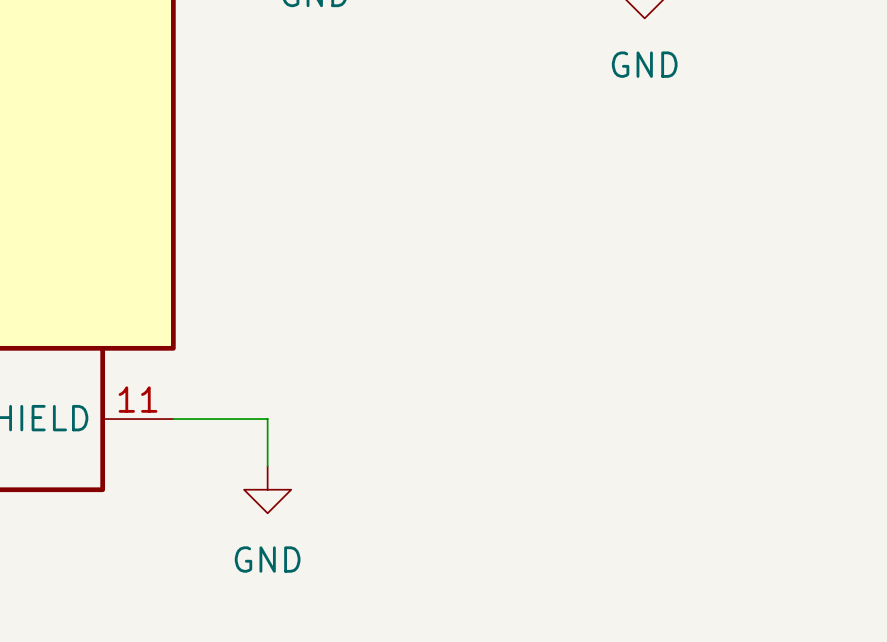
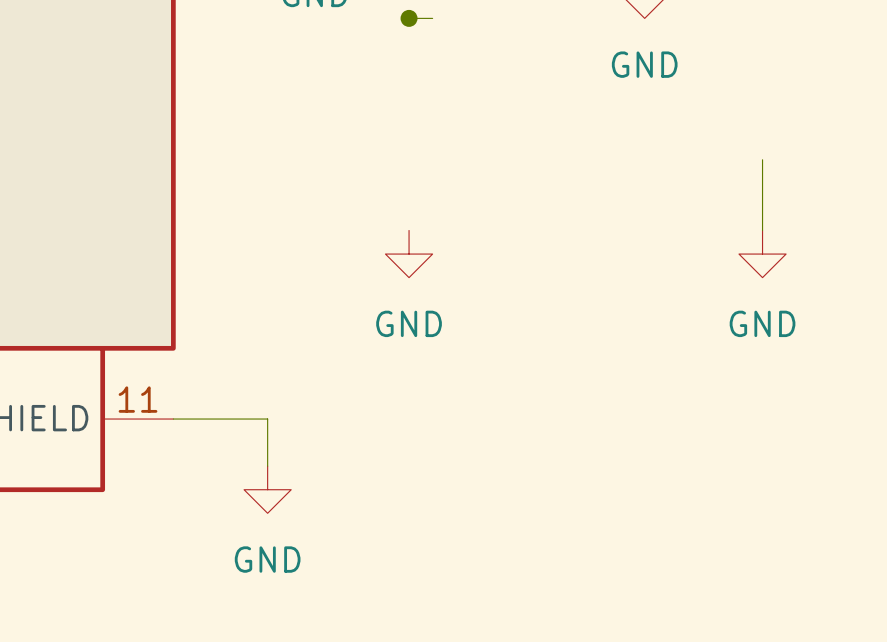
wire: none -> (409, 18) (432, 18)
junction: none -> (409, 18)
wire: none -> (762, 159) (762, 230)
power symbol: none -> GND (409, 254)
power symbol: none -> GND (762, 254)

